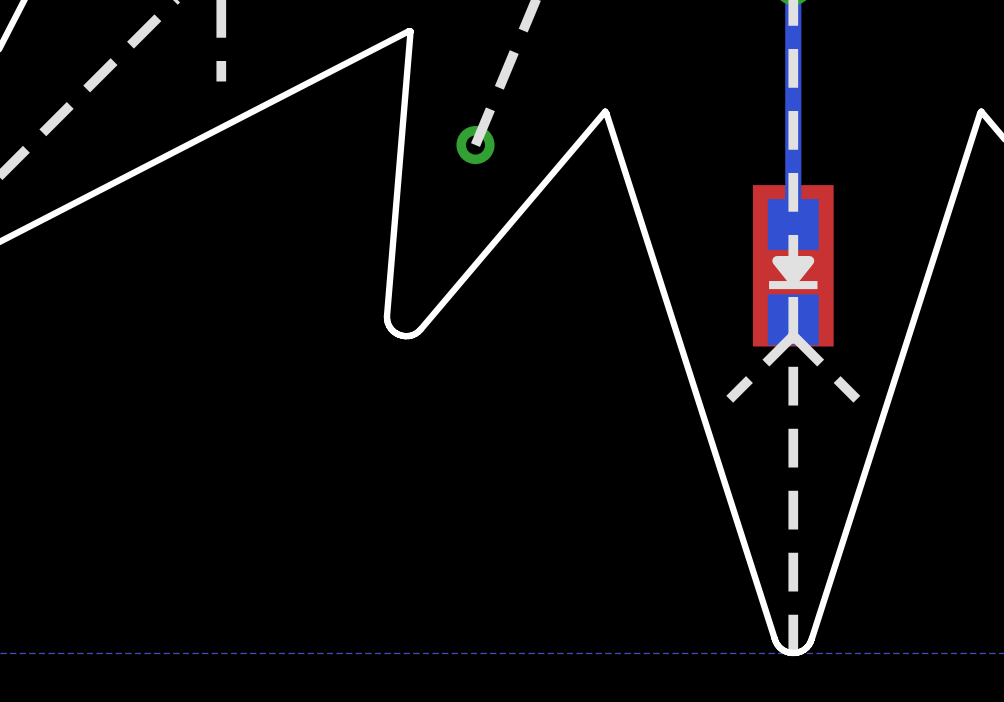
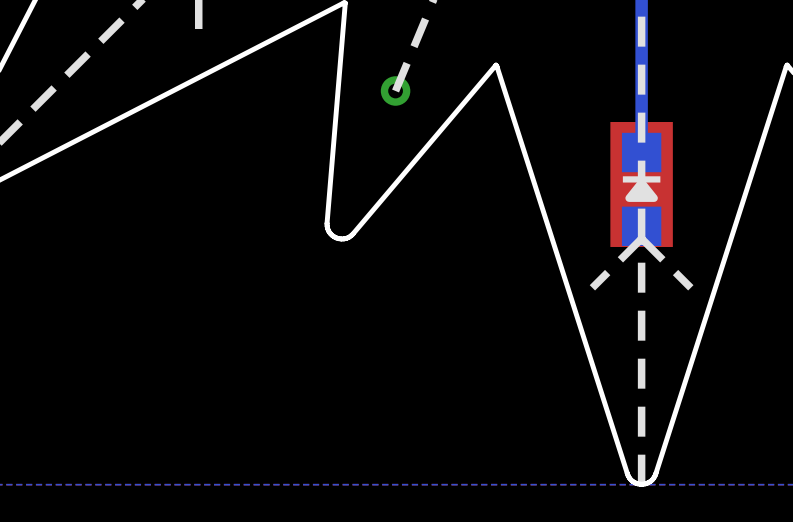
part rotation: 0° (793, 272) -> 180° (641, 189)

